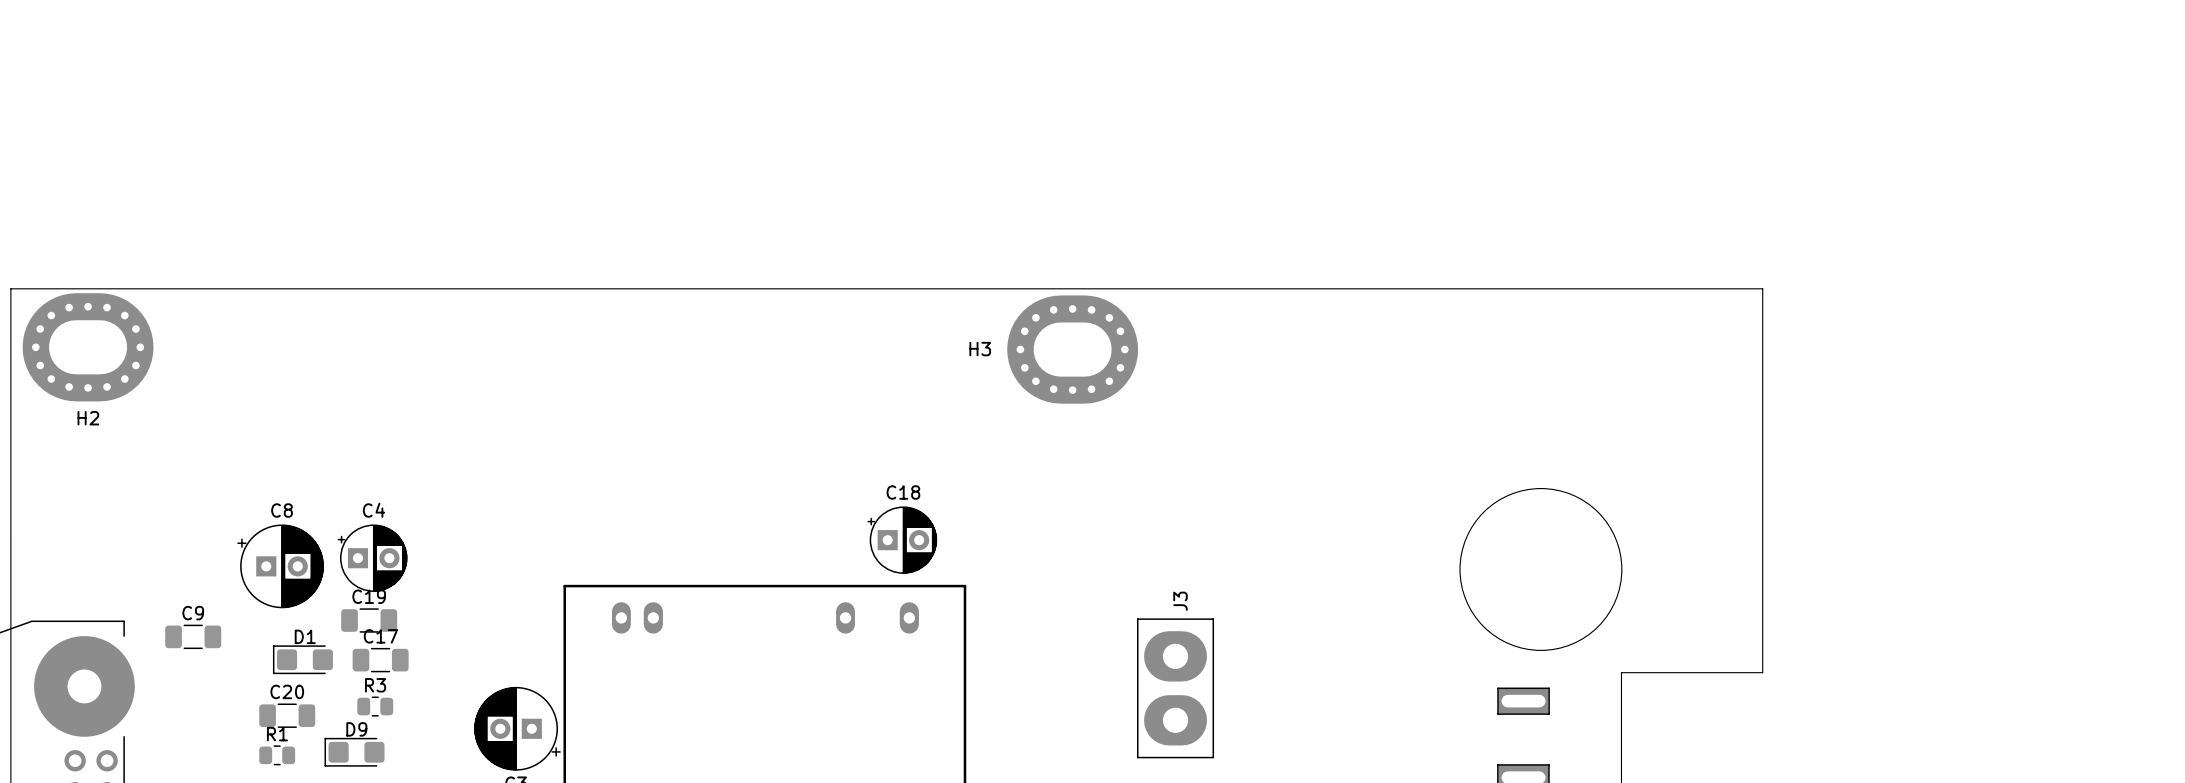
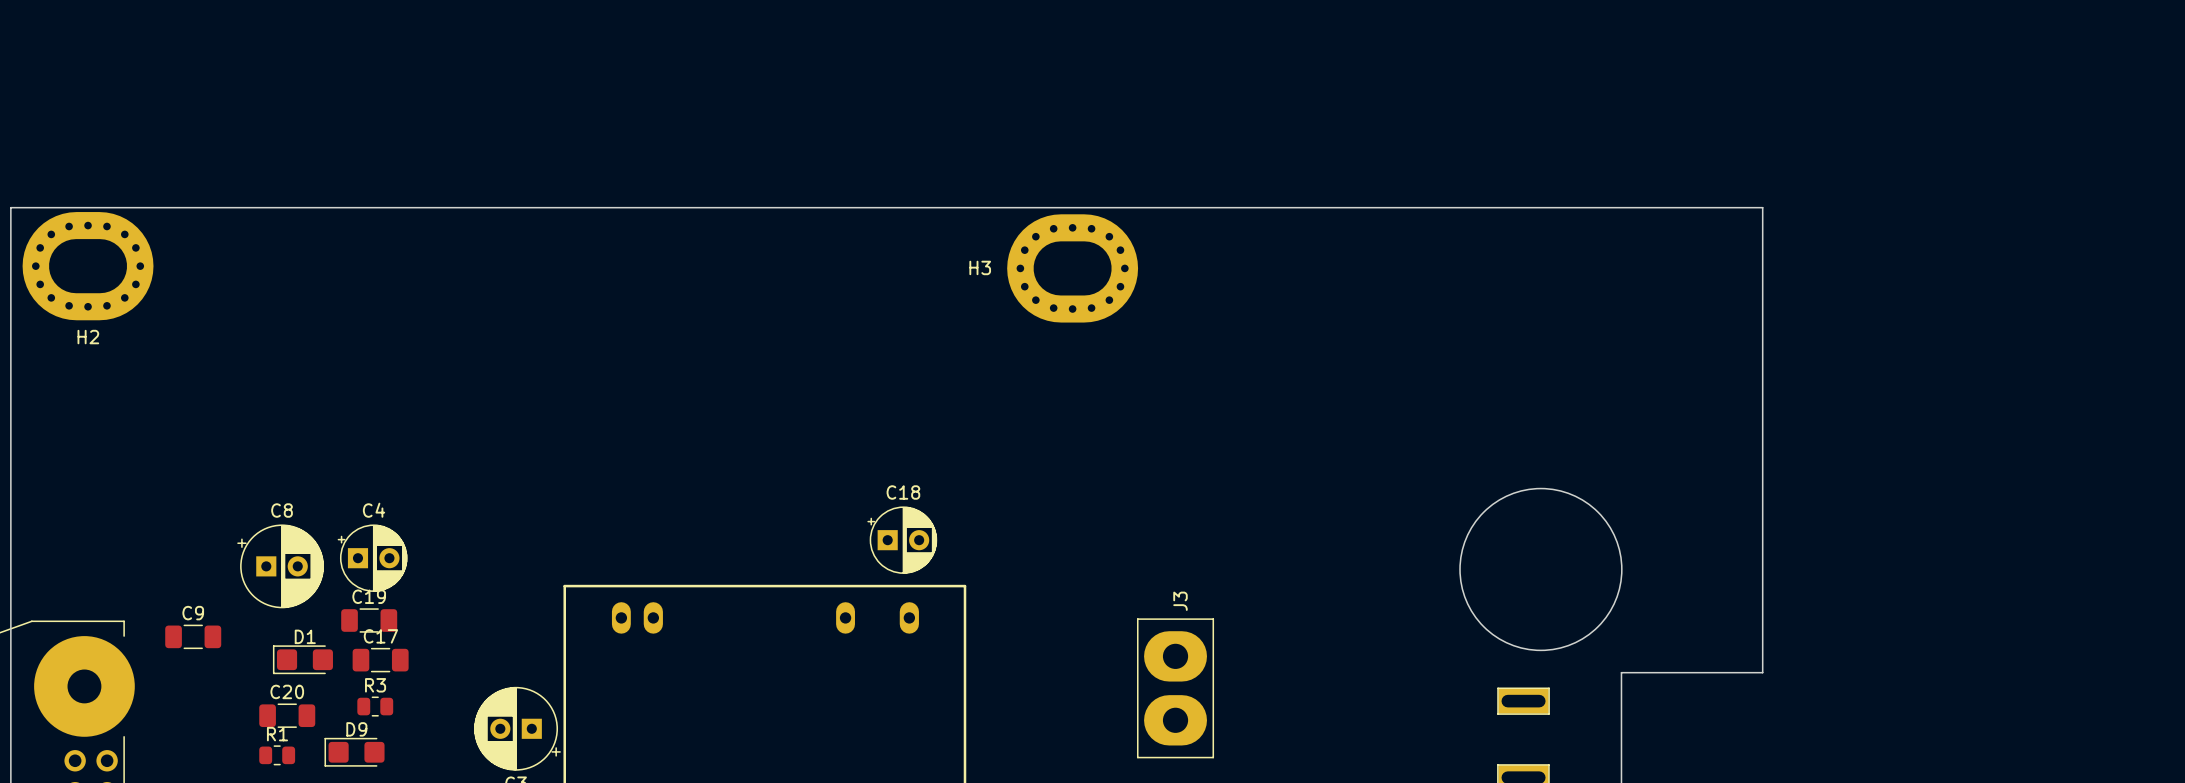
board edge: (10, 288) (1762, 288) (1762, 672) -> (10, 288) (10, 207) (1762, 207) (1762, 672)
H2 position: (88, 347) -> (88, 266)
H3 position: (1072, 349) -> (1072, 268)

